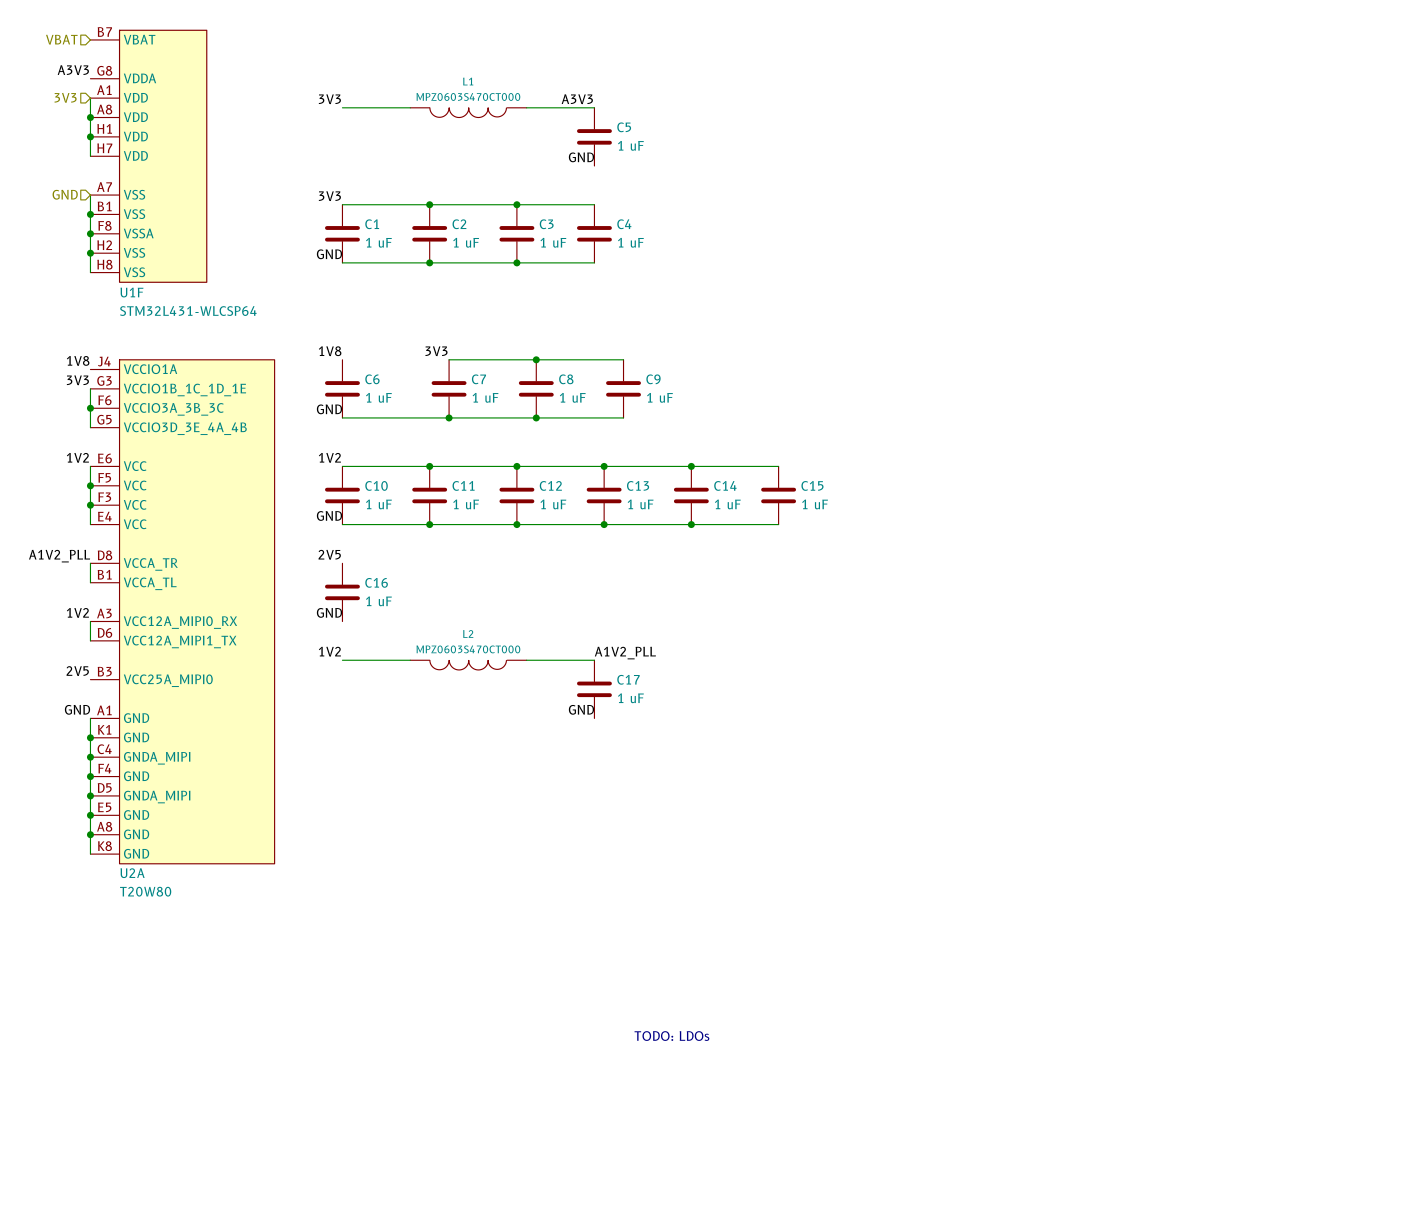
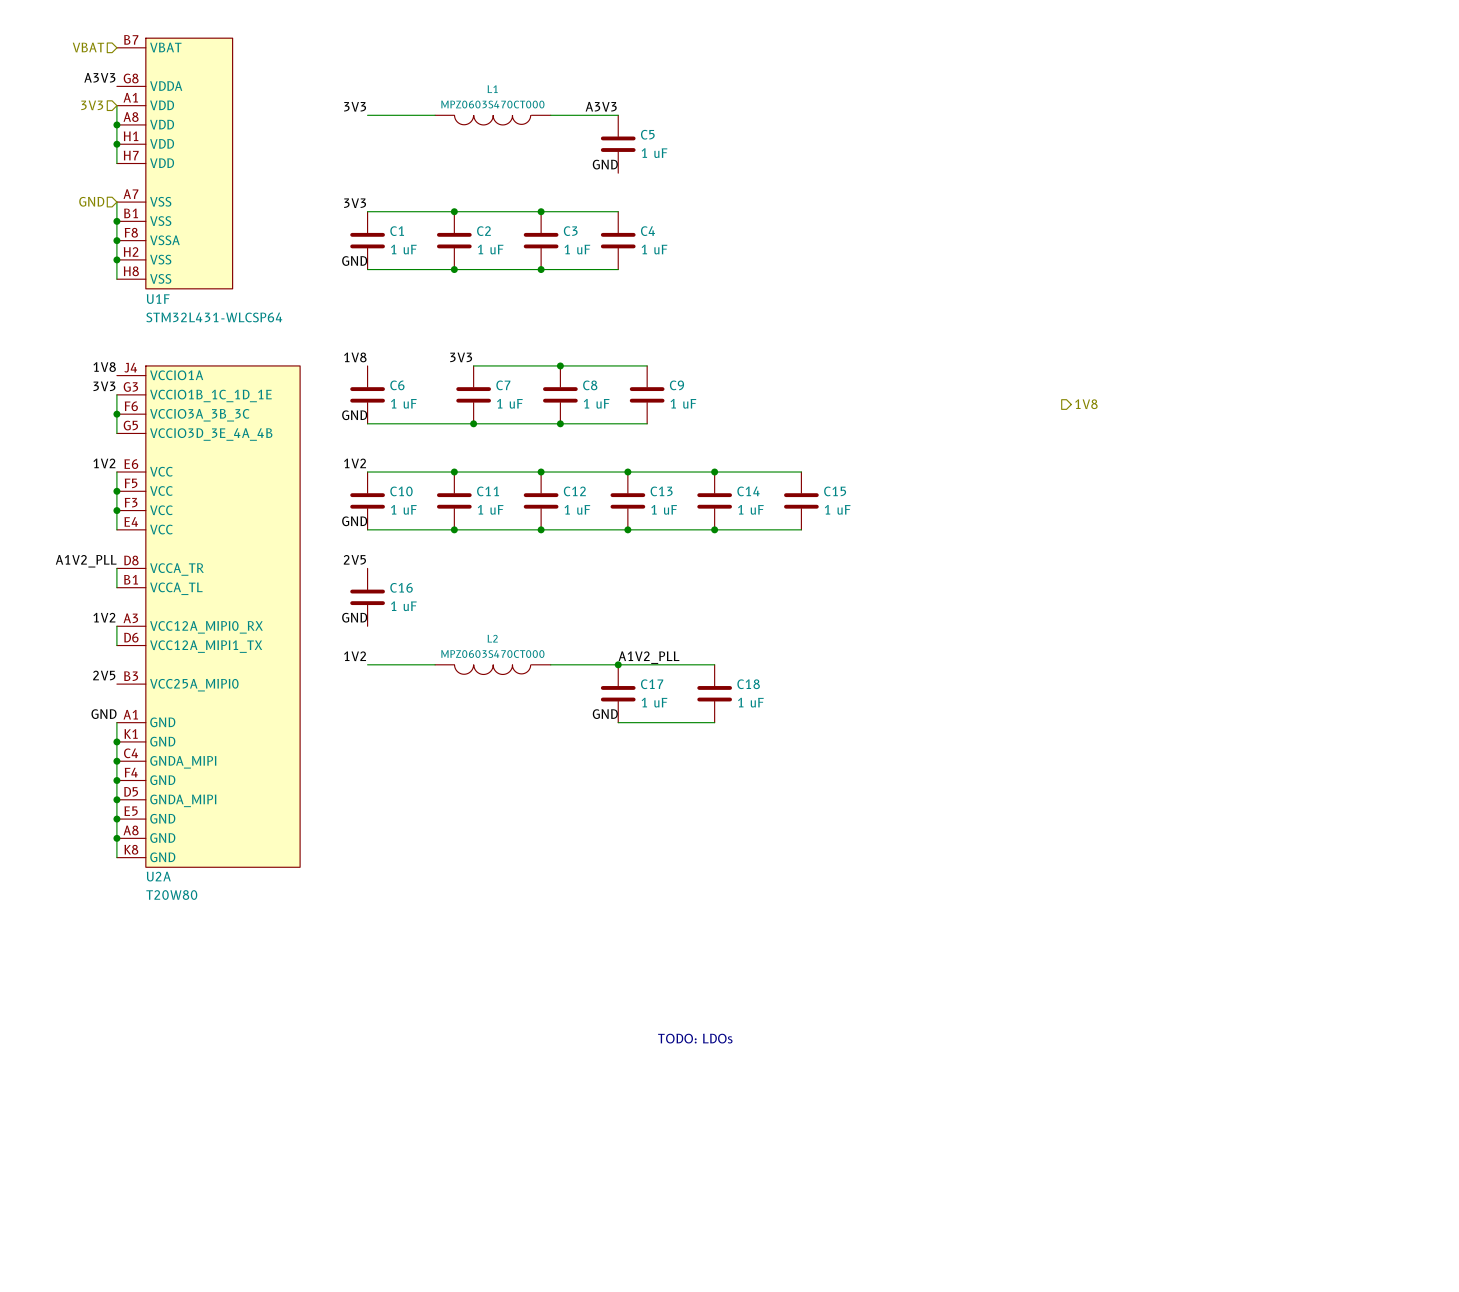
hierarchical label: none -> 1V8 (1086, 404)
wire: none -> (618, 664) (714, 664)
junction: none -> (618, 664)
C18: none -> 1 uF (714, 693)
wire: none -> (618, 722) (714, 722)

